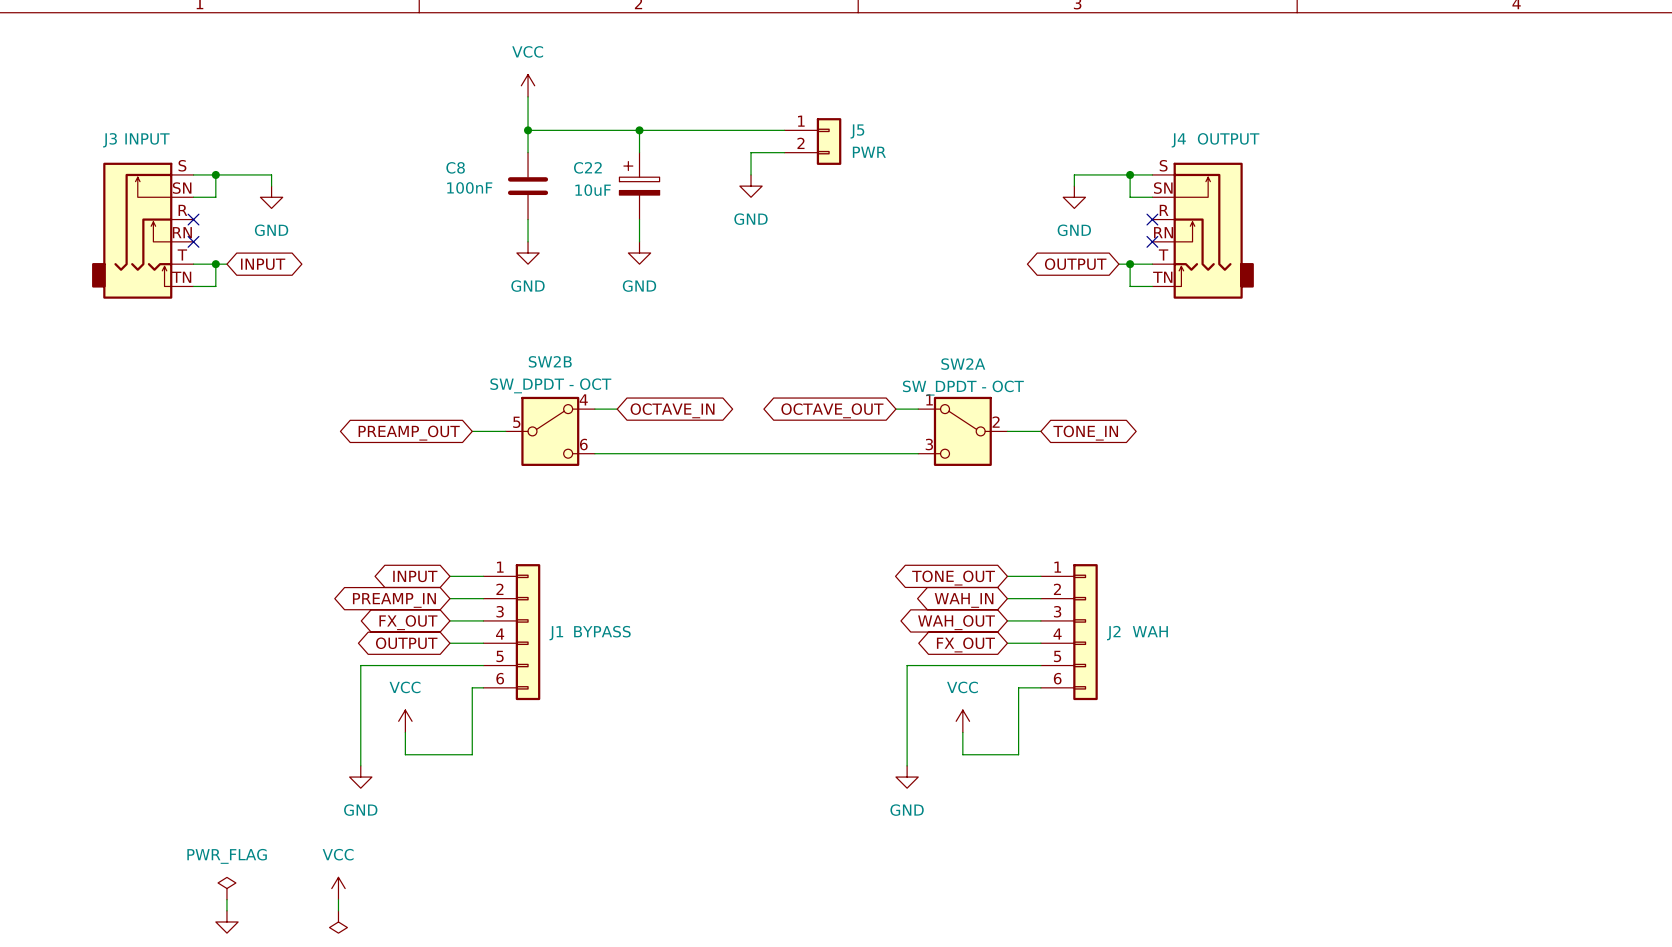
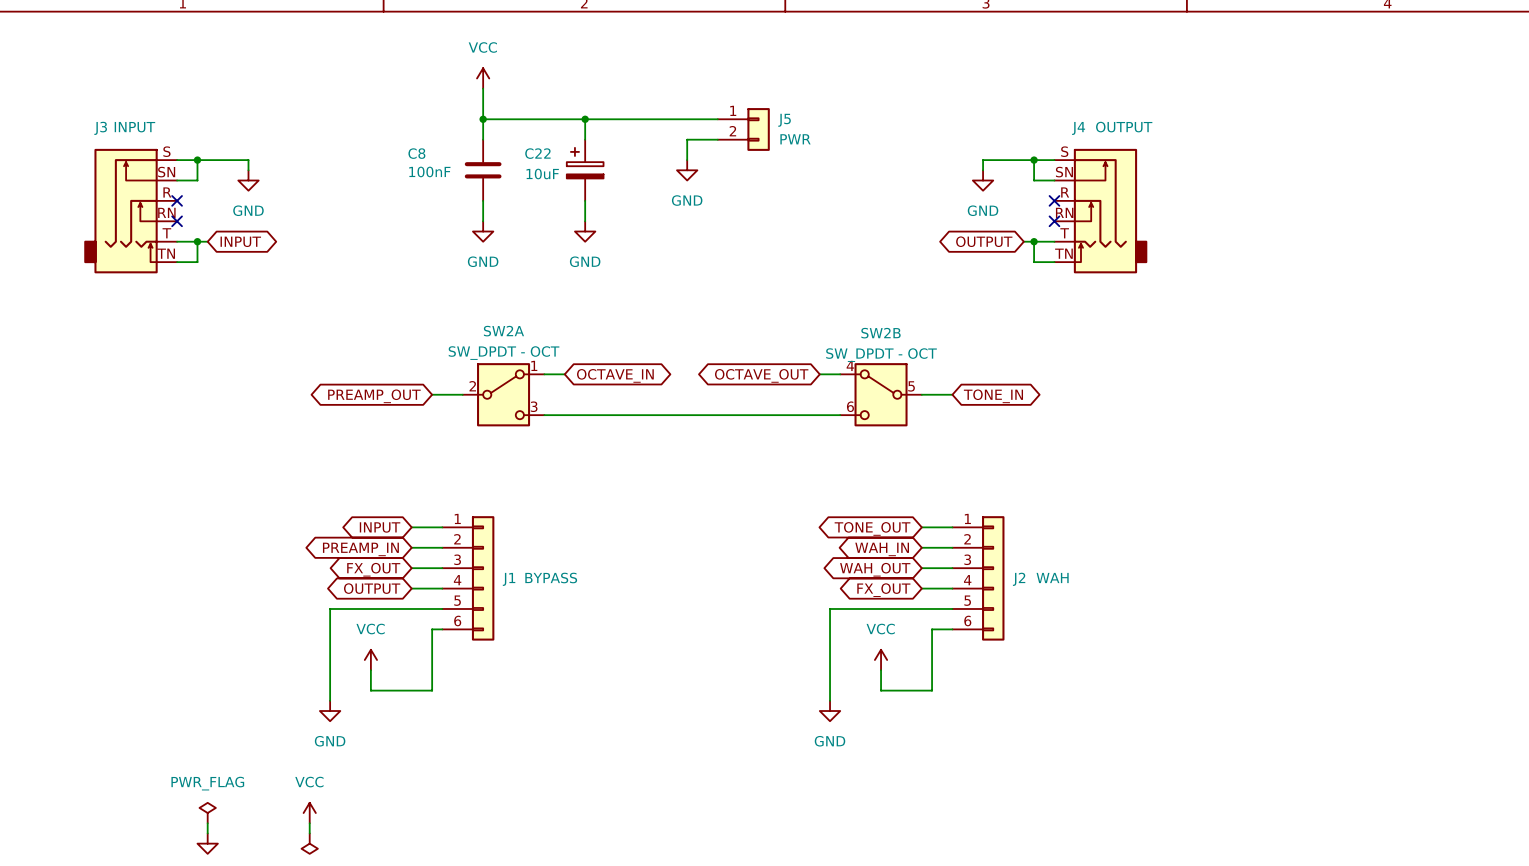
SW2B flip: as is (550, 431) -> left-right (881, 394)
SW2B position: (550, 431) -> (881, 394)
SW2A flip: as is (962, 431) -> left-right (503, 394)
SW2A position: (962, 431) -> (503, 394)

